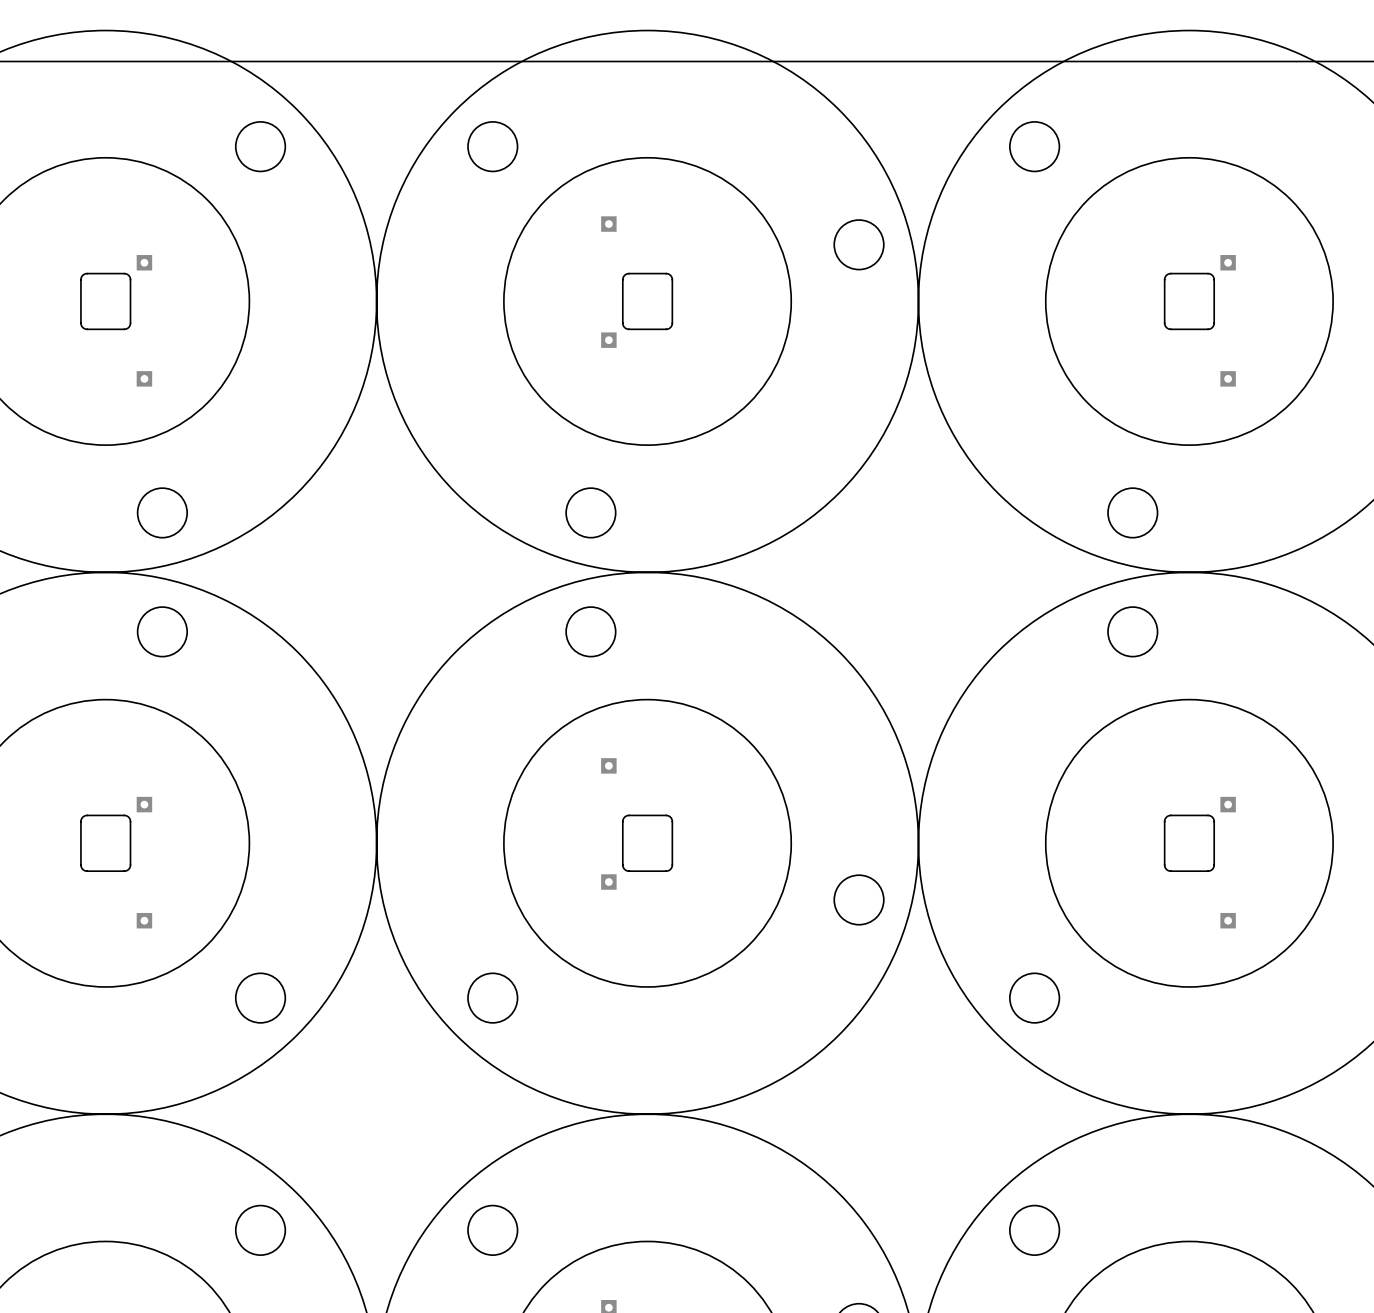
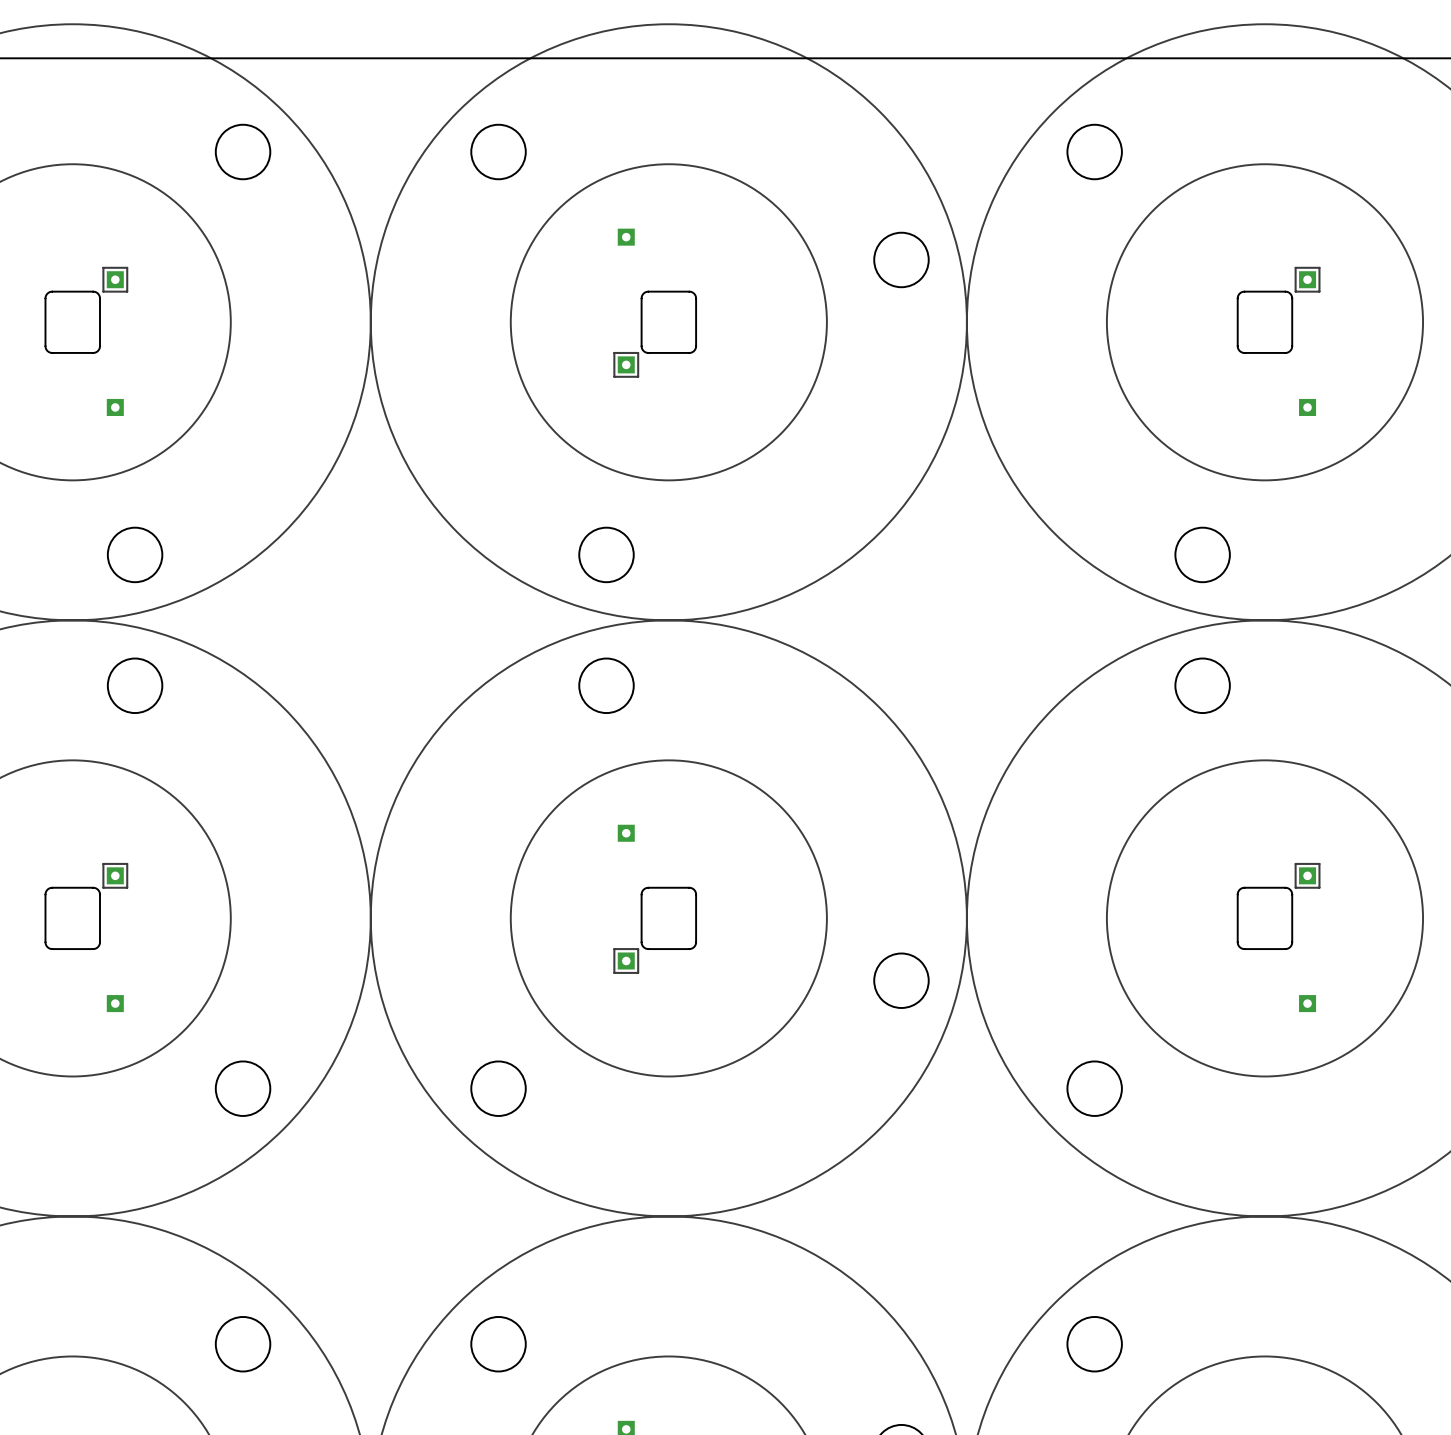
part side: bottom (144, 262) -> top (115, 279)
part side: bottom (1228, 262) -> top (1307, 279)
part side: bottom (608, 340) -> top (626, 364)
part side: bottom (144, 804) -> top (115, 875)
part side: bottom (1228, 804) -> top (1307, 875)
part side: bottom (608, 882) -> top (626, 961)

